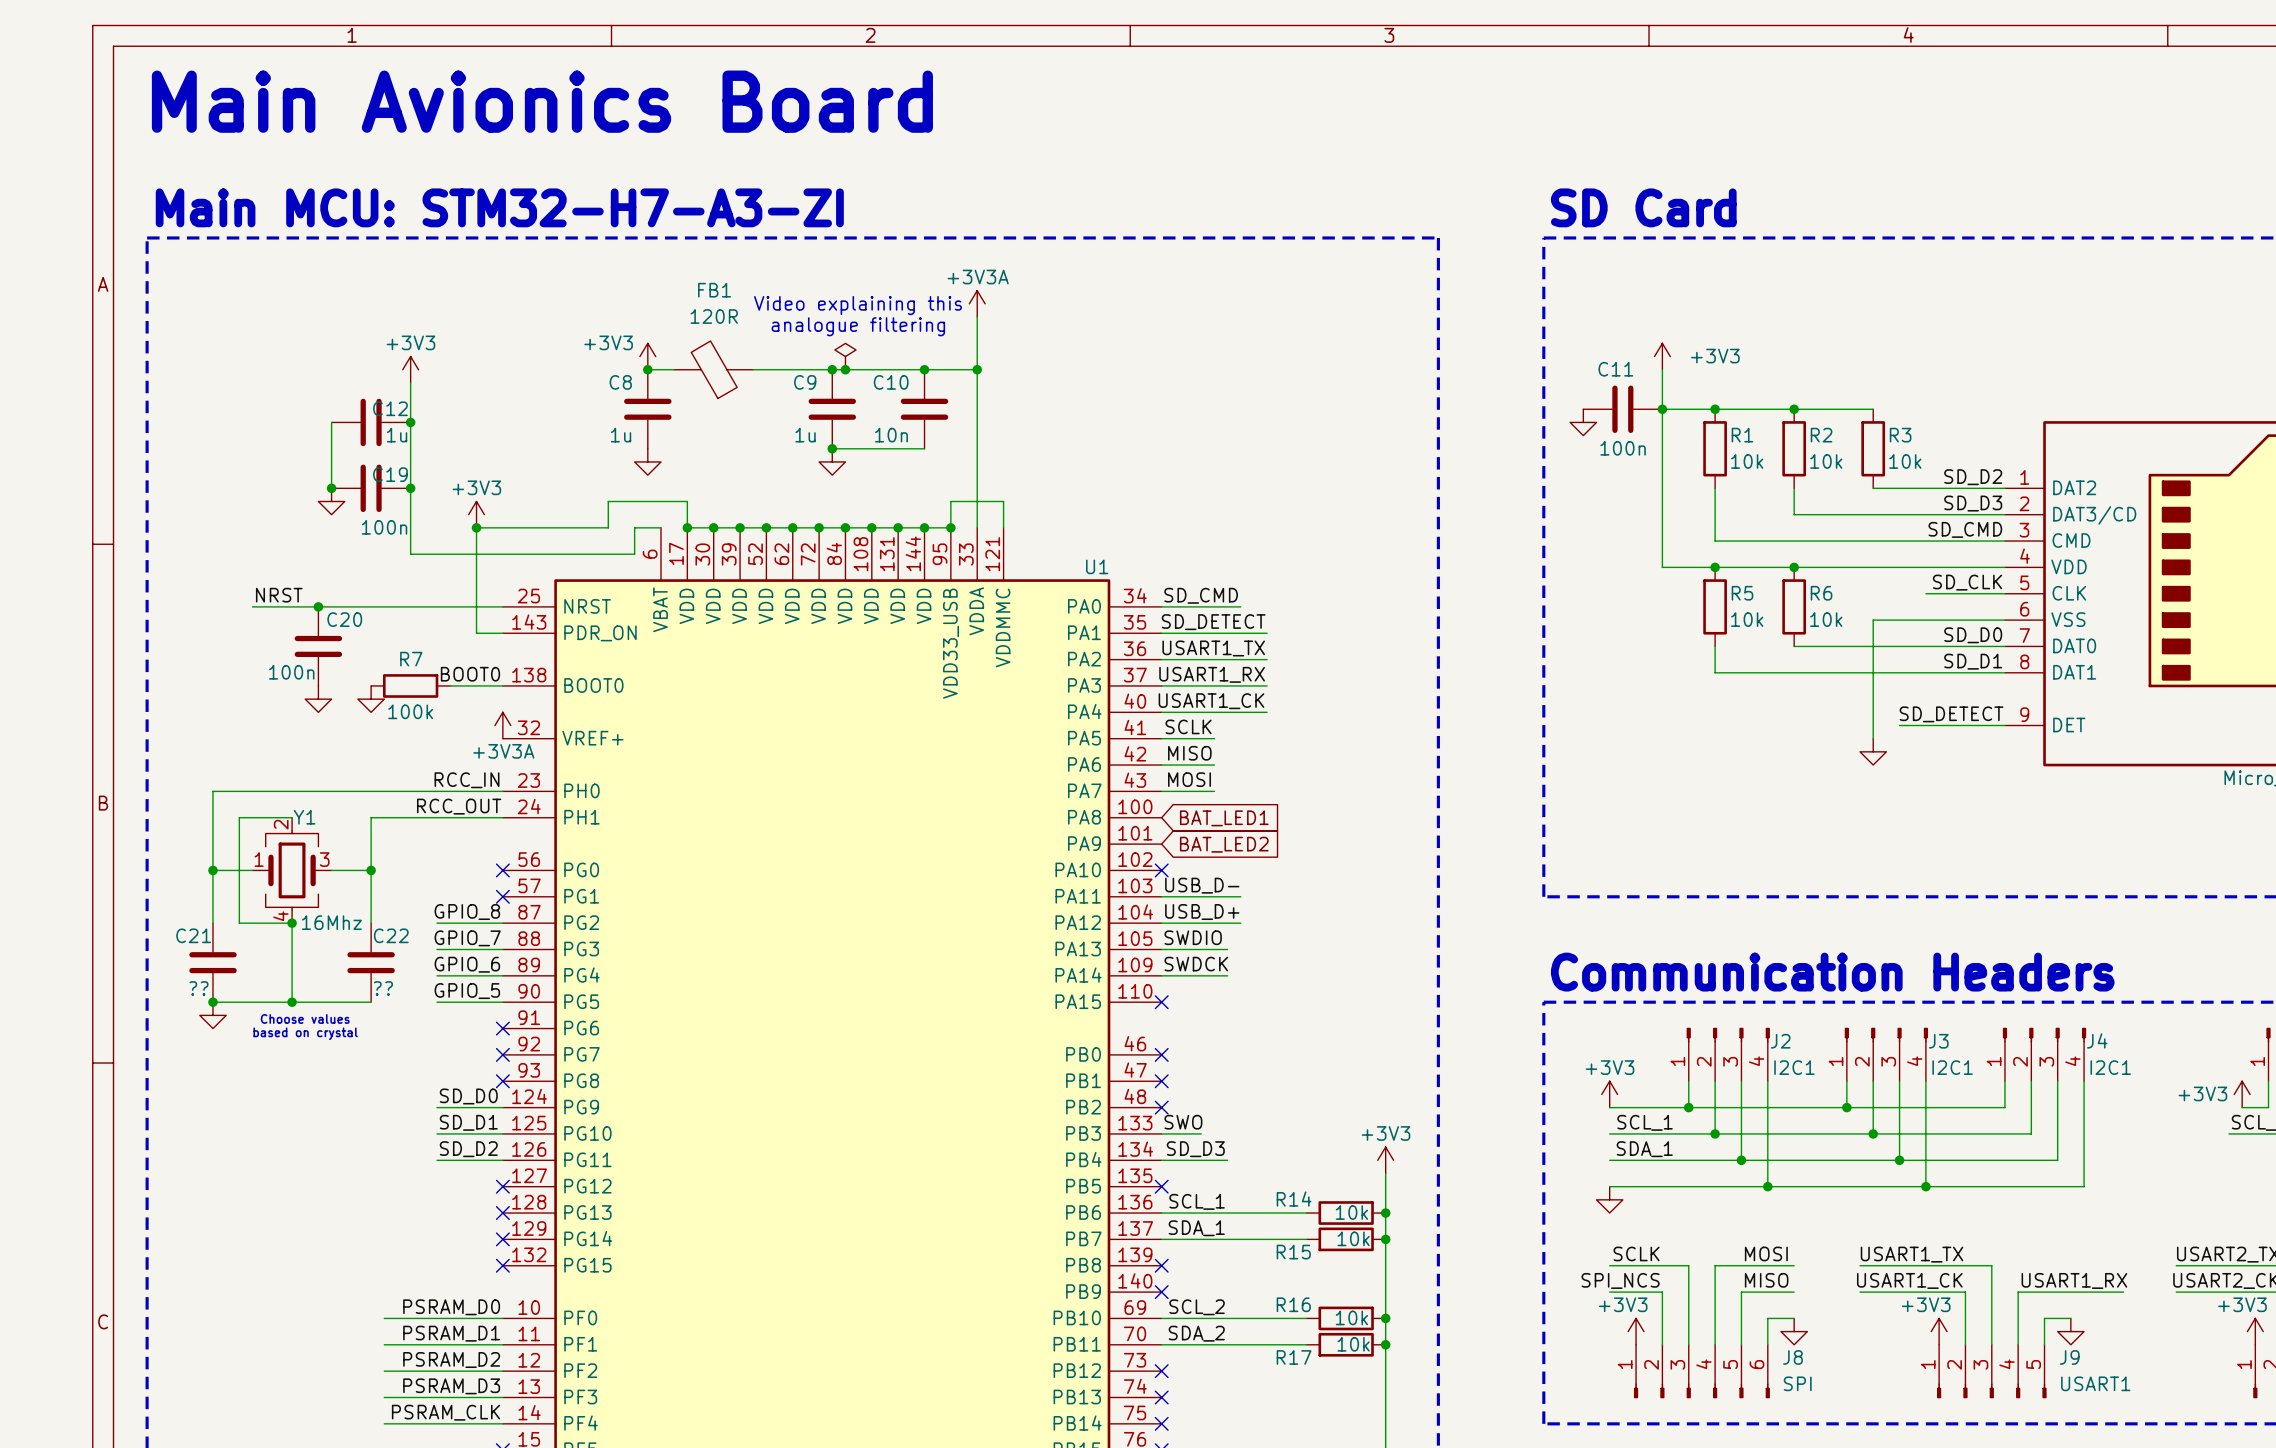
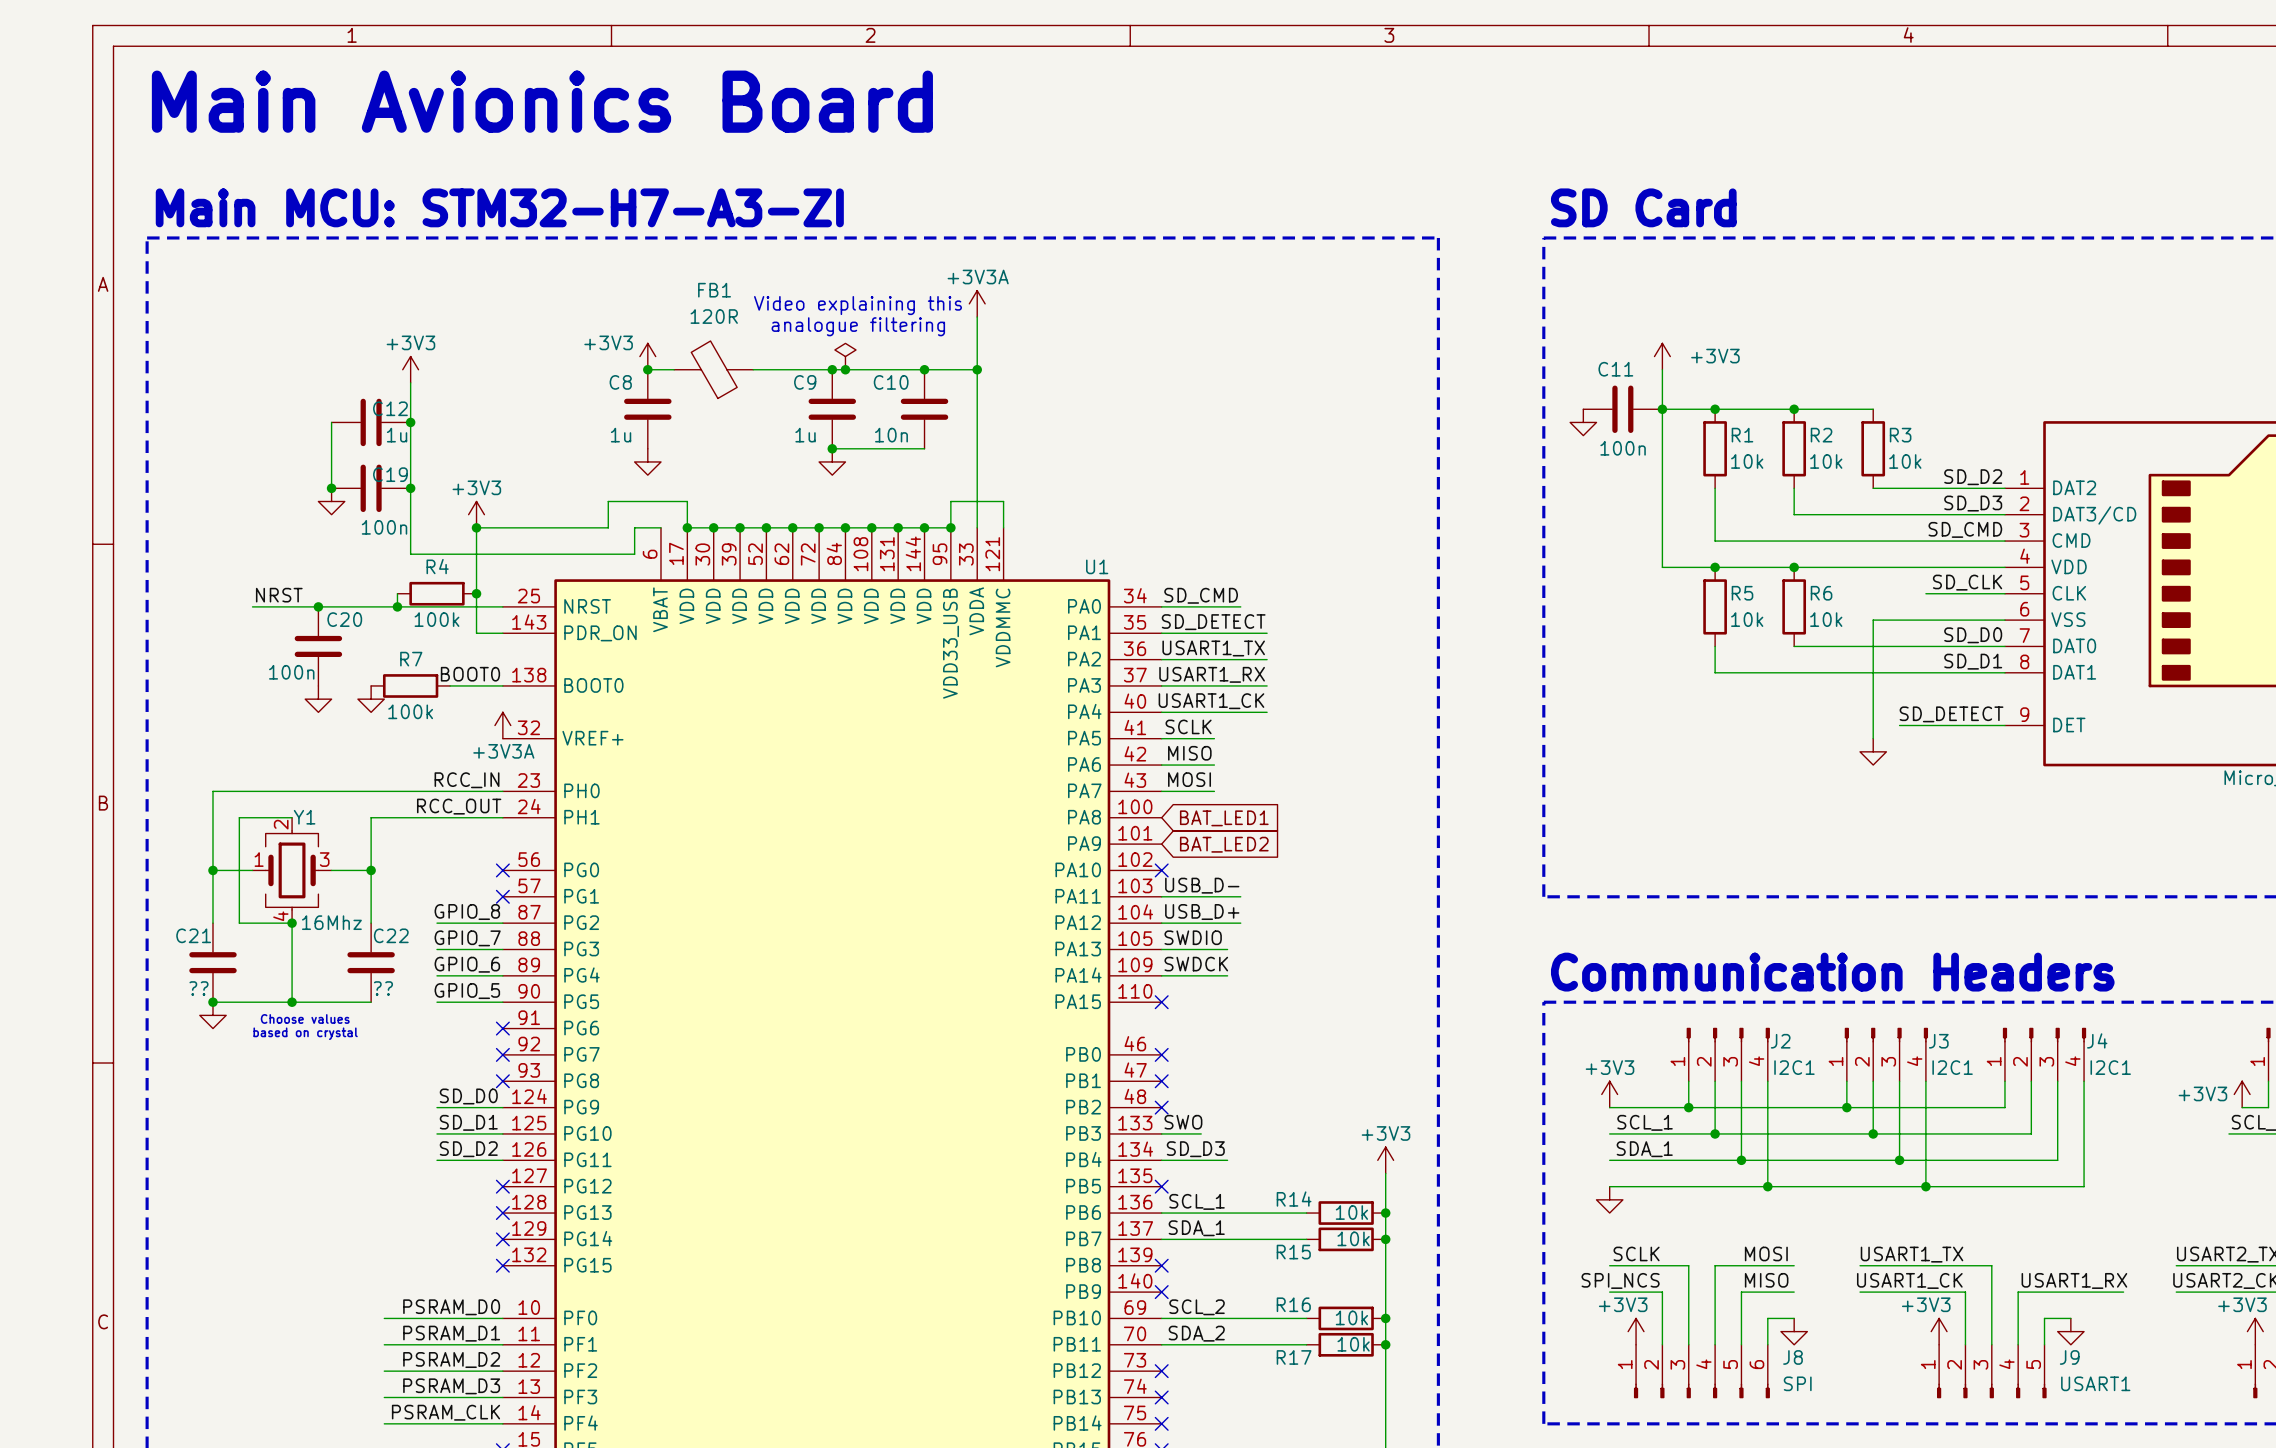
wire: none -> (397, 593) (397, 606)
R4: none -> 100k (436, 593)
junction: none -> (476, 593)
junction: none -> (397, 606)

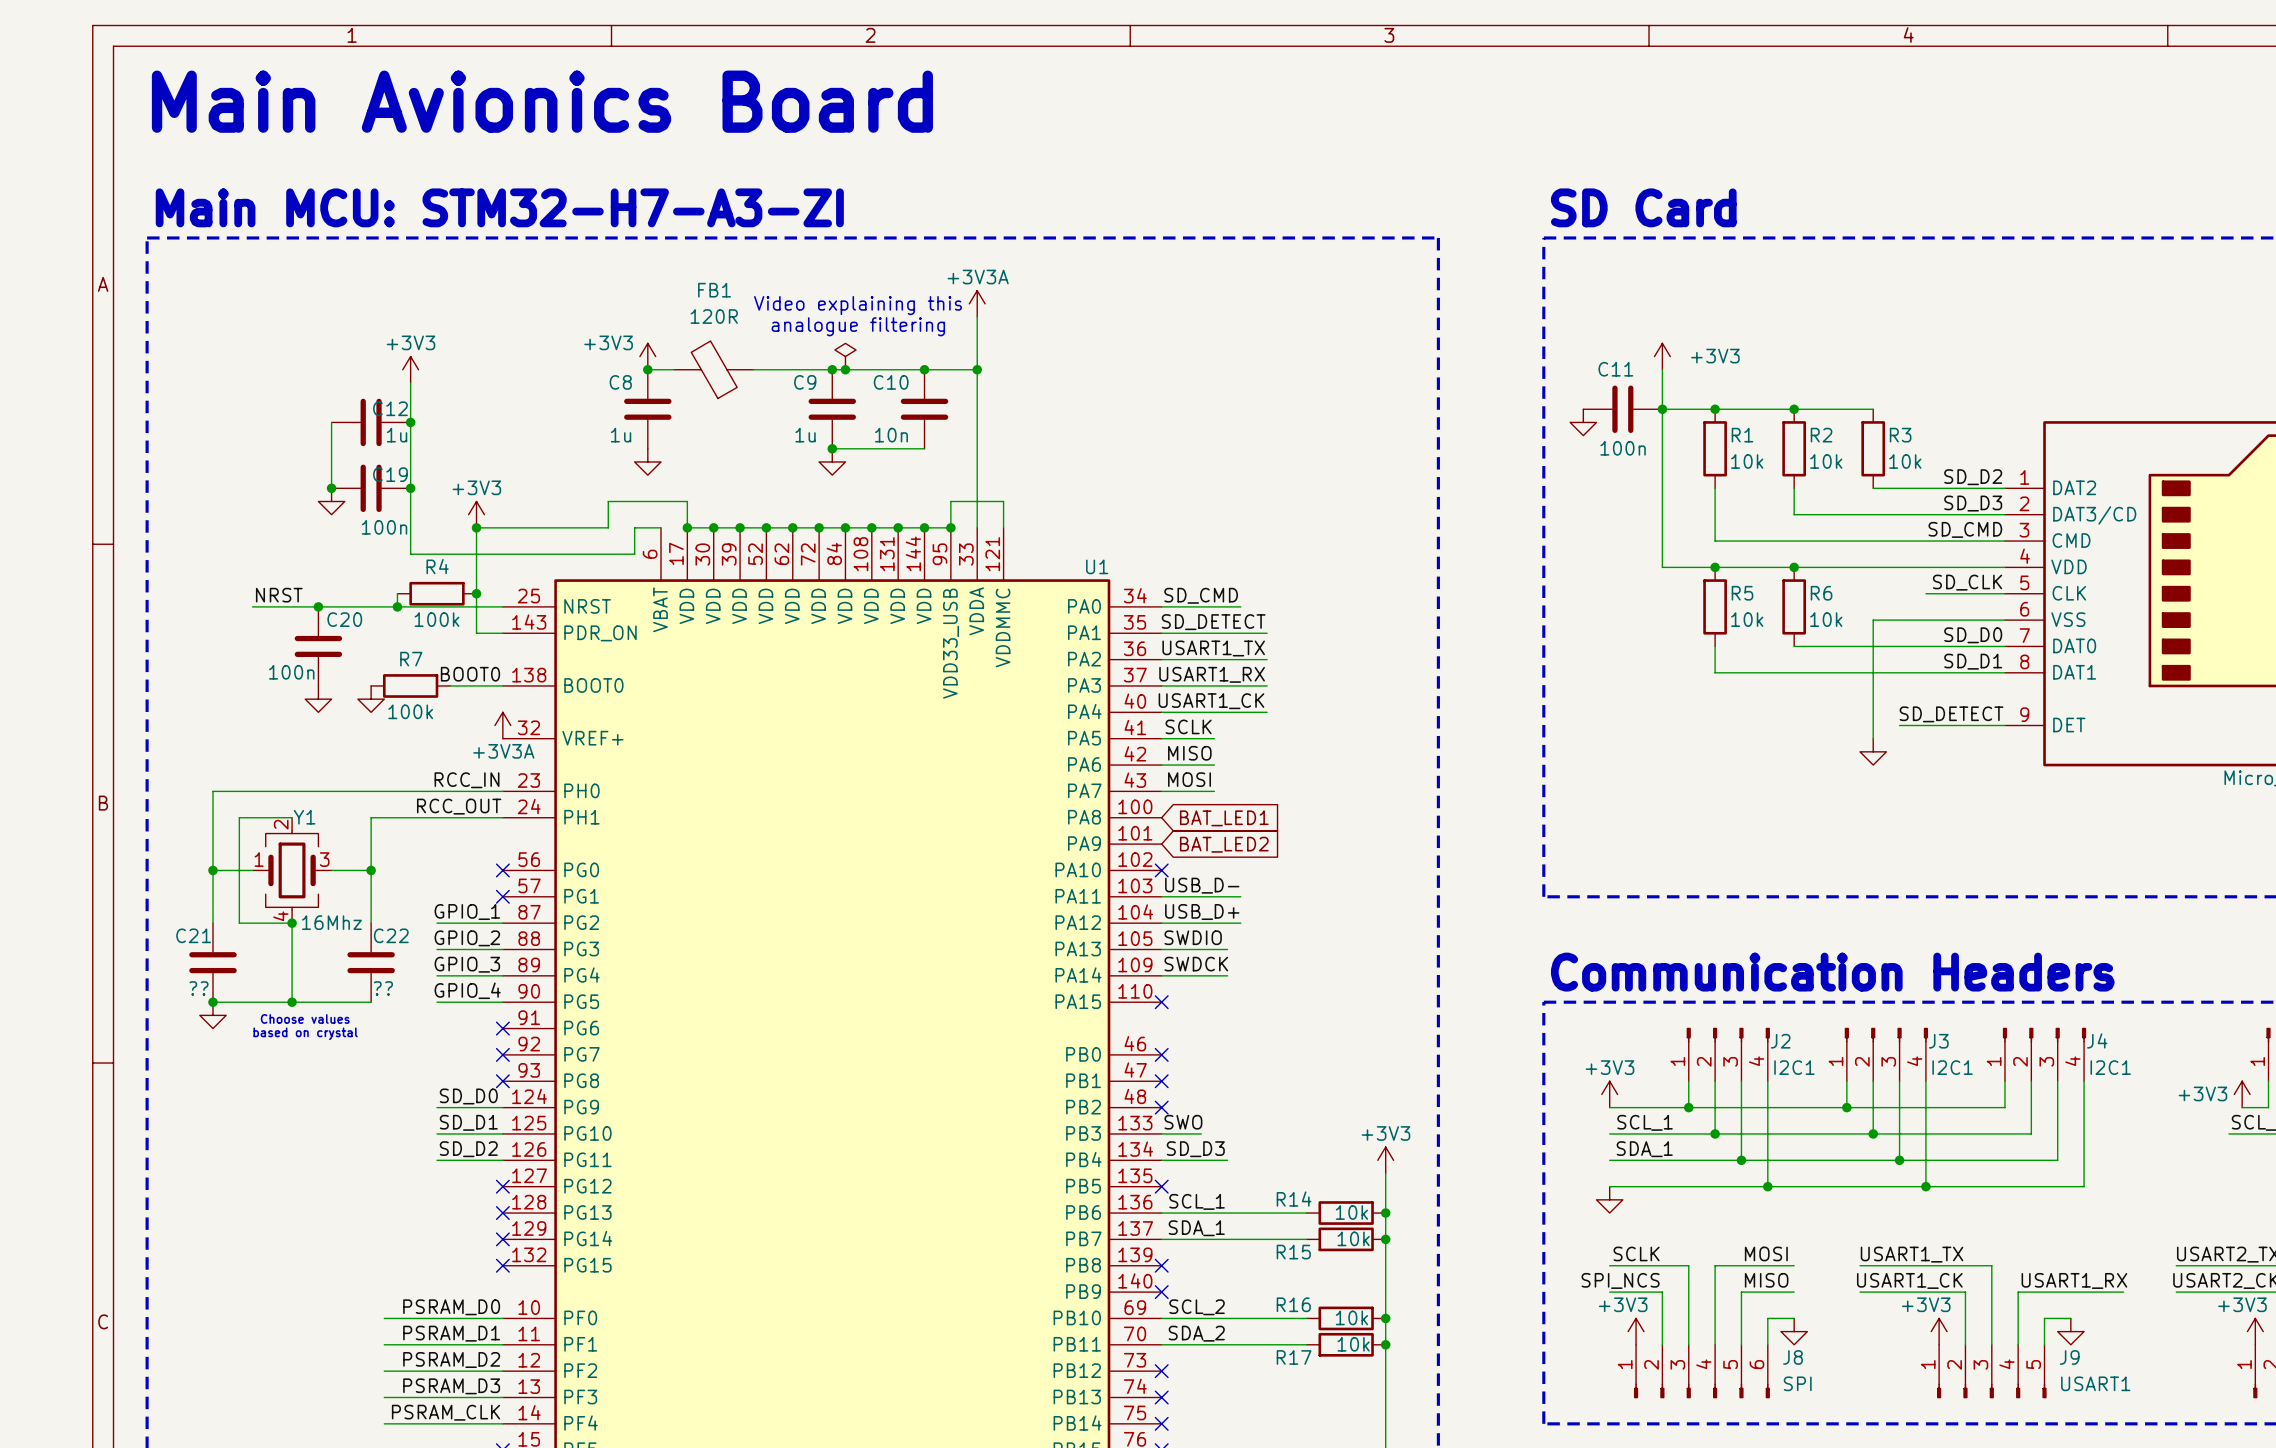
label: GPIO_8 (467, 912) -> GPIO_1 (467, 912)
label: GPIO_7 (467, 938) -> GPIO_2 (467, 938)
label: GPIO_6 (467, 964) -> GPIO_3 (467, 964)
label: GPIO_5 (467, 991) -> GPIO_4 (467, 990)

